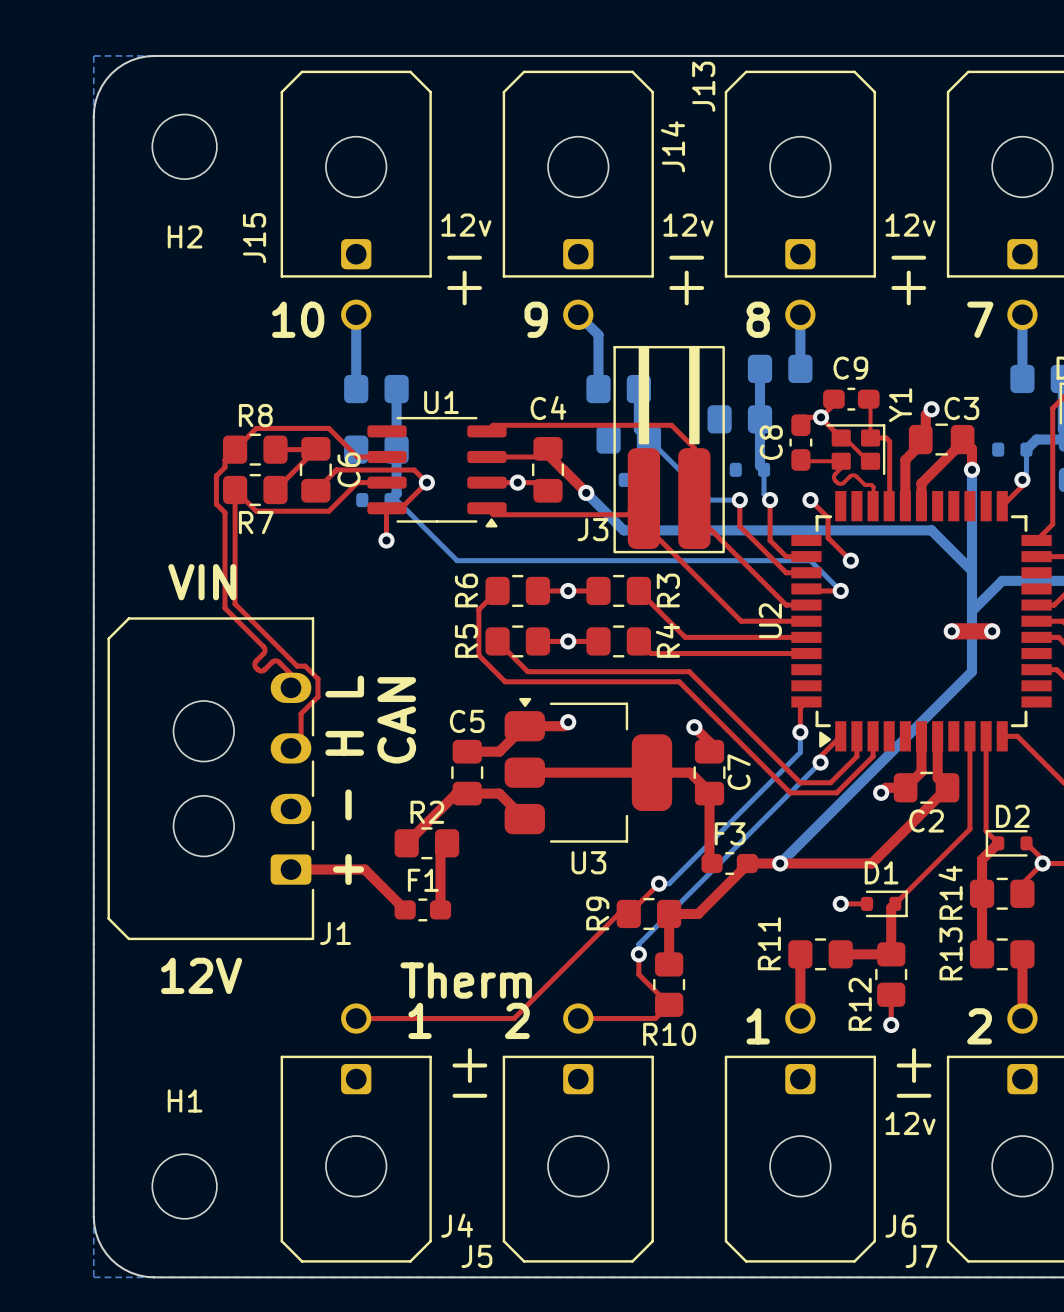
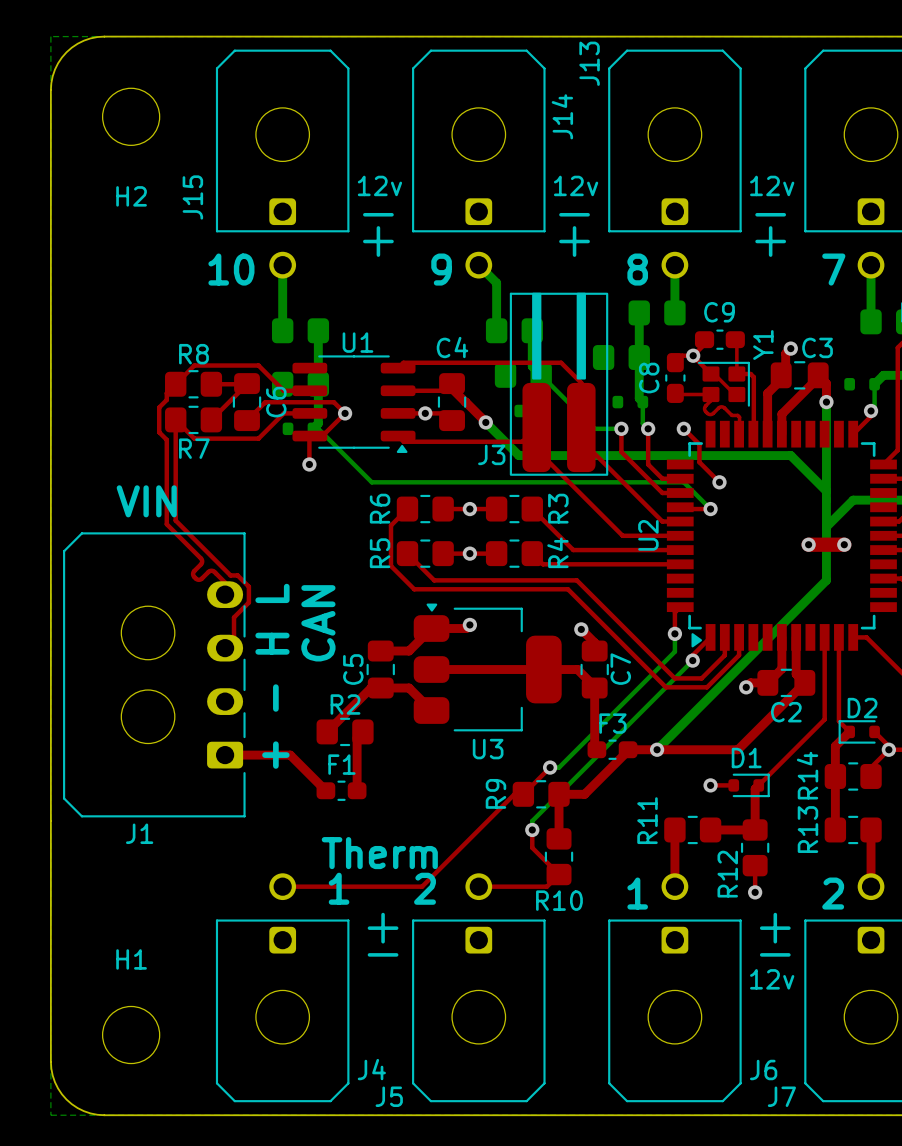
C5 name rotation: 0° (467, 721) -> 90° counterclockwise (353, 669)
C5 name position: C5 (467, 721) -> C5 (353, 669)
J1 name position: J1 (335, 933) -> J1 (139, 833)
text: 12V (201, 975) -> none

